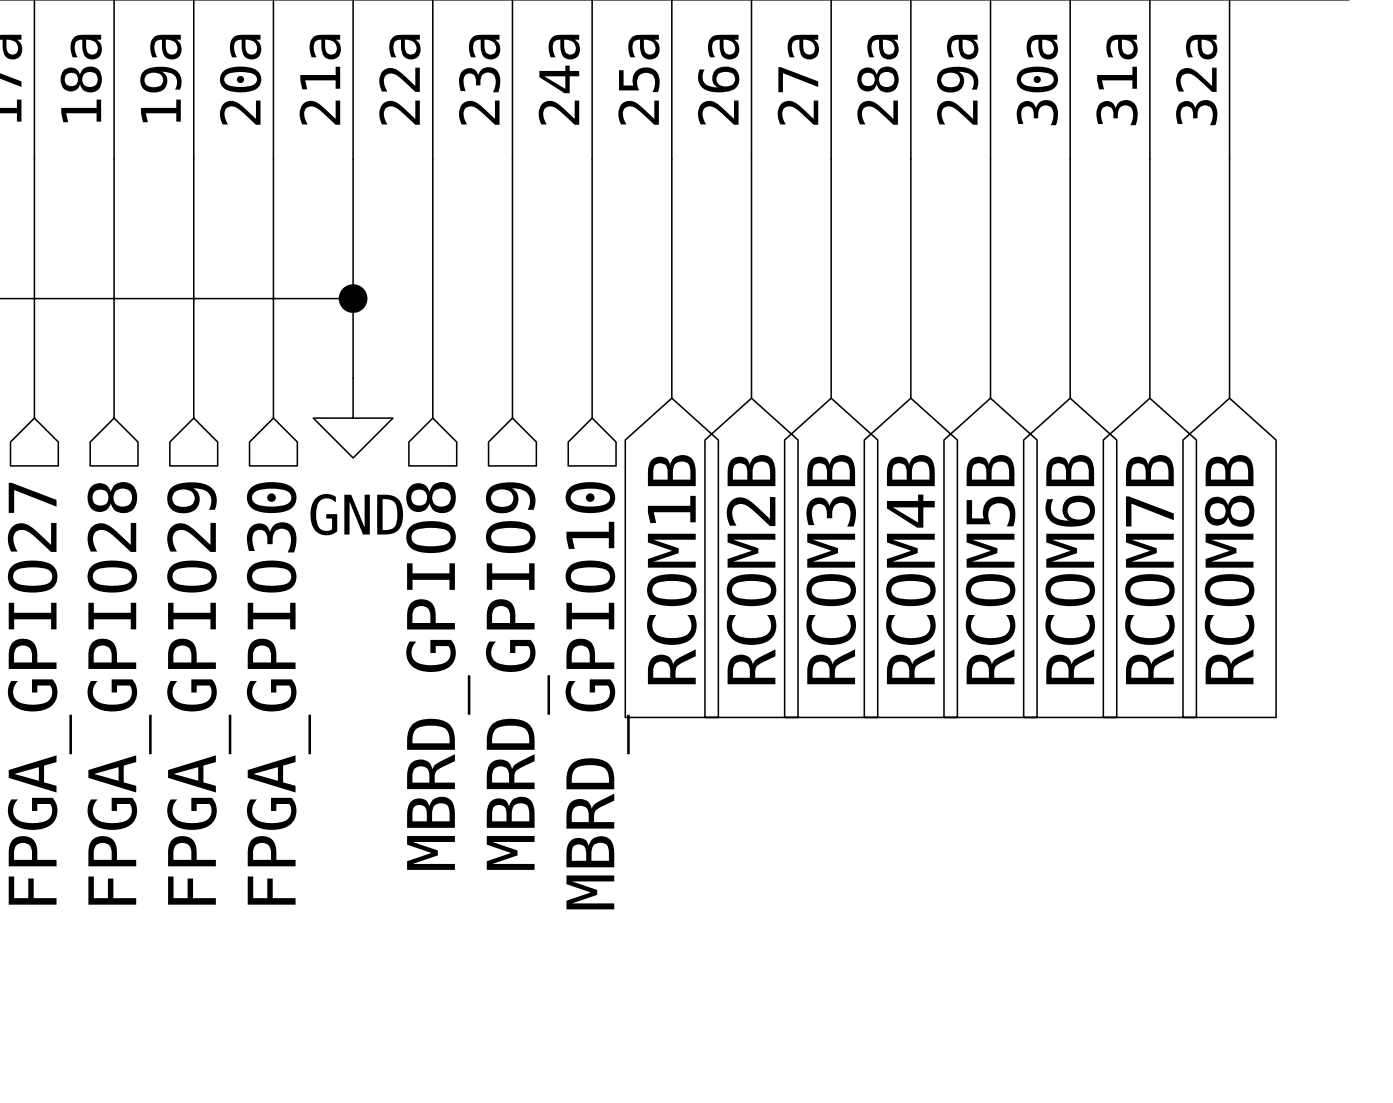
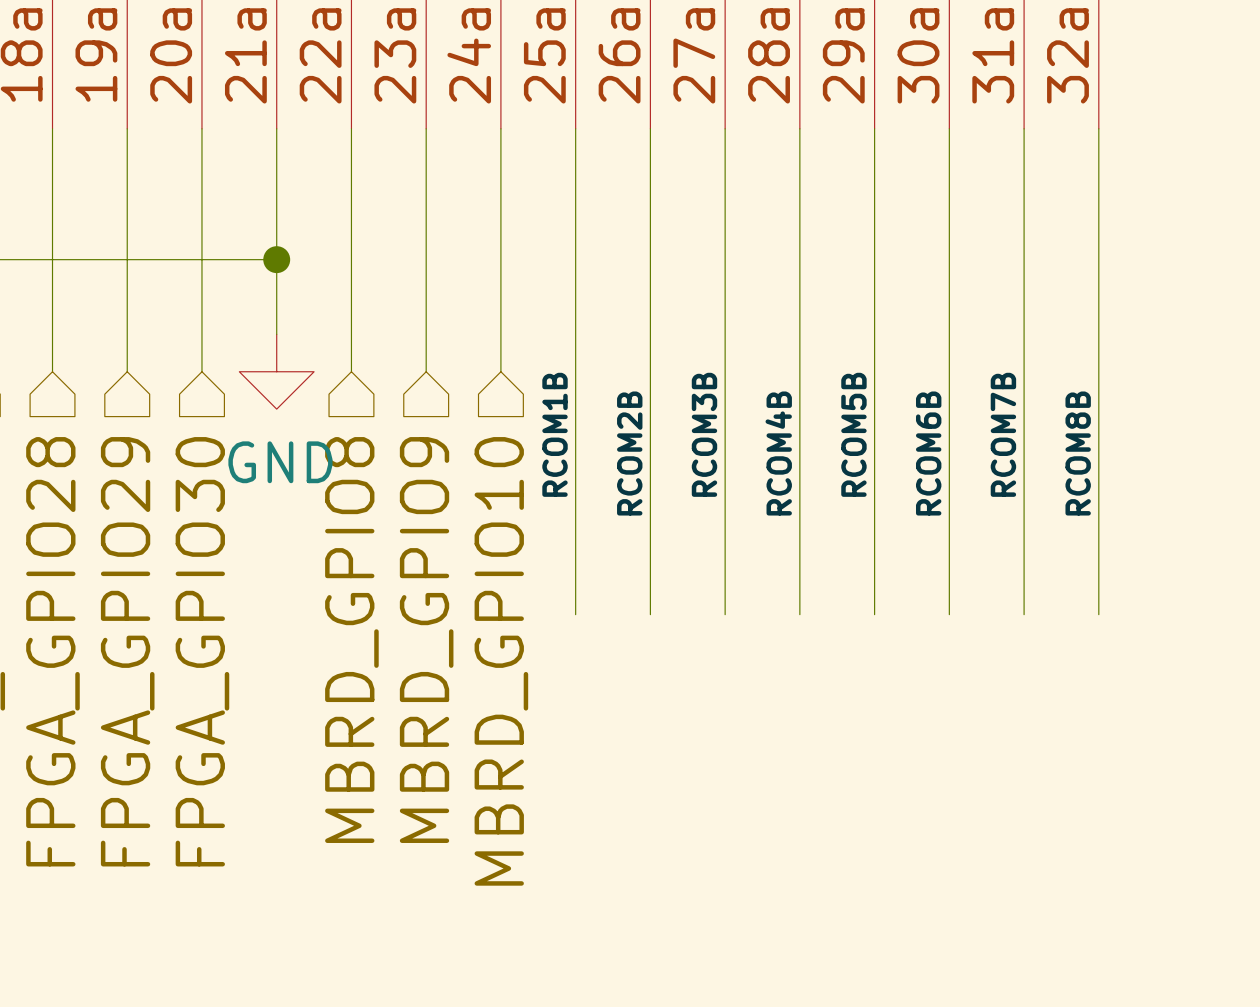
wire: none -> (575, 353) (575, 614)
wire: none -> (650, 353) (650, 614)
wire: none -> (725, 353) (725, 614)
wire: none -> (799, 353) (799, 614)
wire: none -> (874, 353) (874, 614)
wire: none -> (949, 353) (949, 614)
wire: none -> (1024, 353) (1024, 614)
wire: none -> (1098, 353) (1098, 614)
label: none -> RCOM1B (555, 434)
label: none -> RCOM3B (704, 434)
label: none -> RCOM5B (853, 434)
label: none -> RCOM7B (1003, 434)
label: none -> RCOM2B (629, 453)
label: none -> RCOM4B (778, 453)
label: none -> RCOM6B (928, 453)
label: none -> RCOM8B (1078, 453)
global label: RCOM1B (671, 569) -> none
global label: RCOM2B (751, 569) -> none
global label: RCOM3B (831, 569) -> none
global label: RCOM4B (910, 569) -> none
global label: RCOM5B (990, 569) -> none
global label: RCOM6B (1070, 569) -> none
global label: RCOM7B (1149, 569) -> none
global label: RCOM8B (1229, 569) -> none

